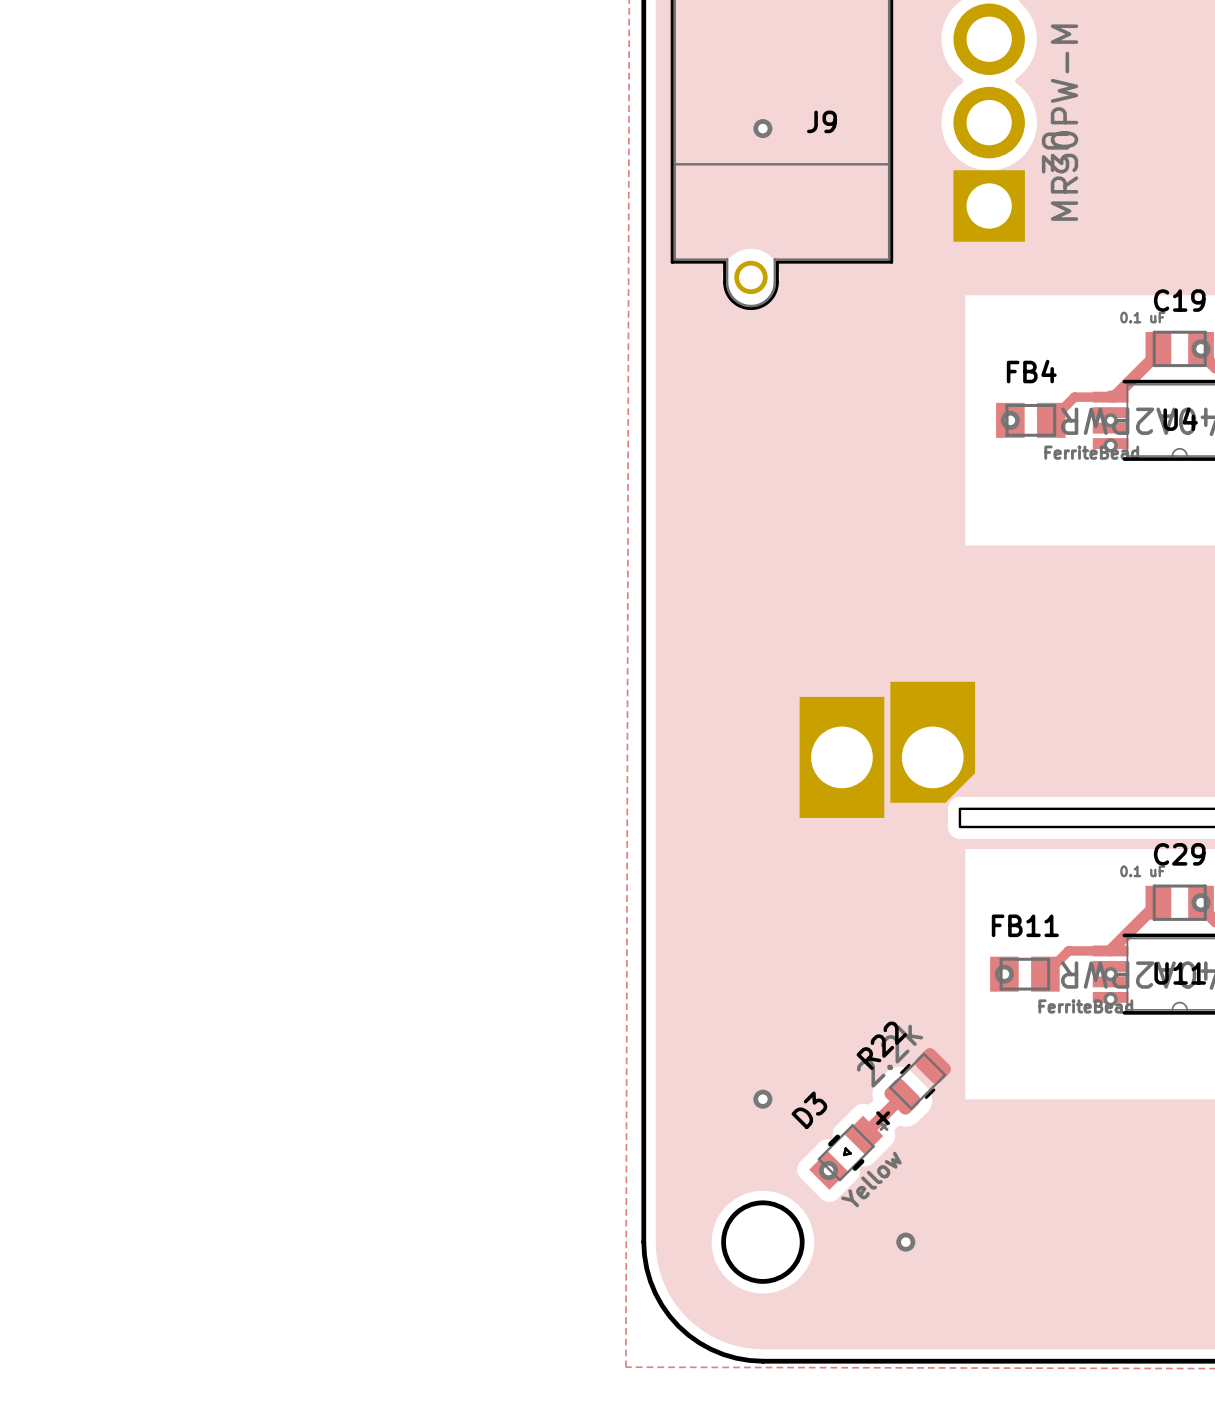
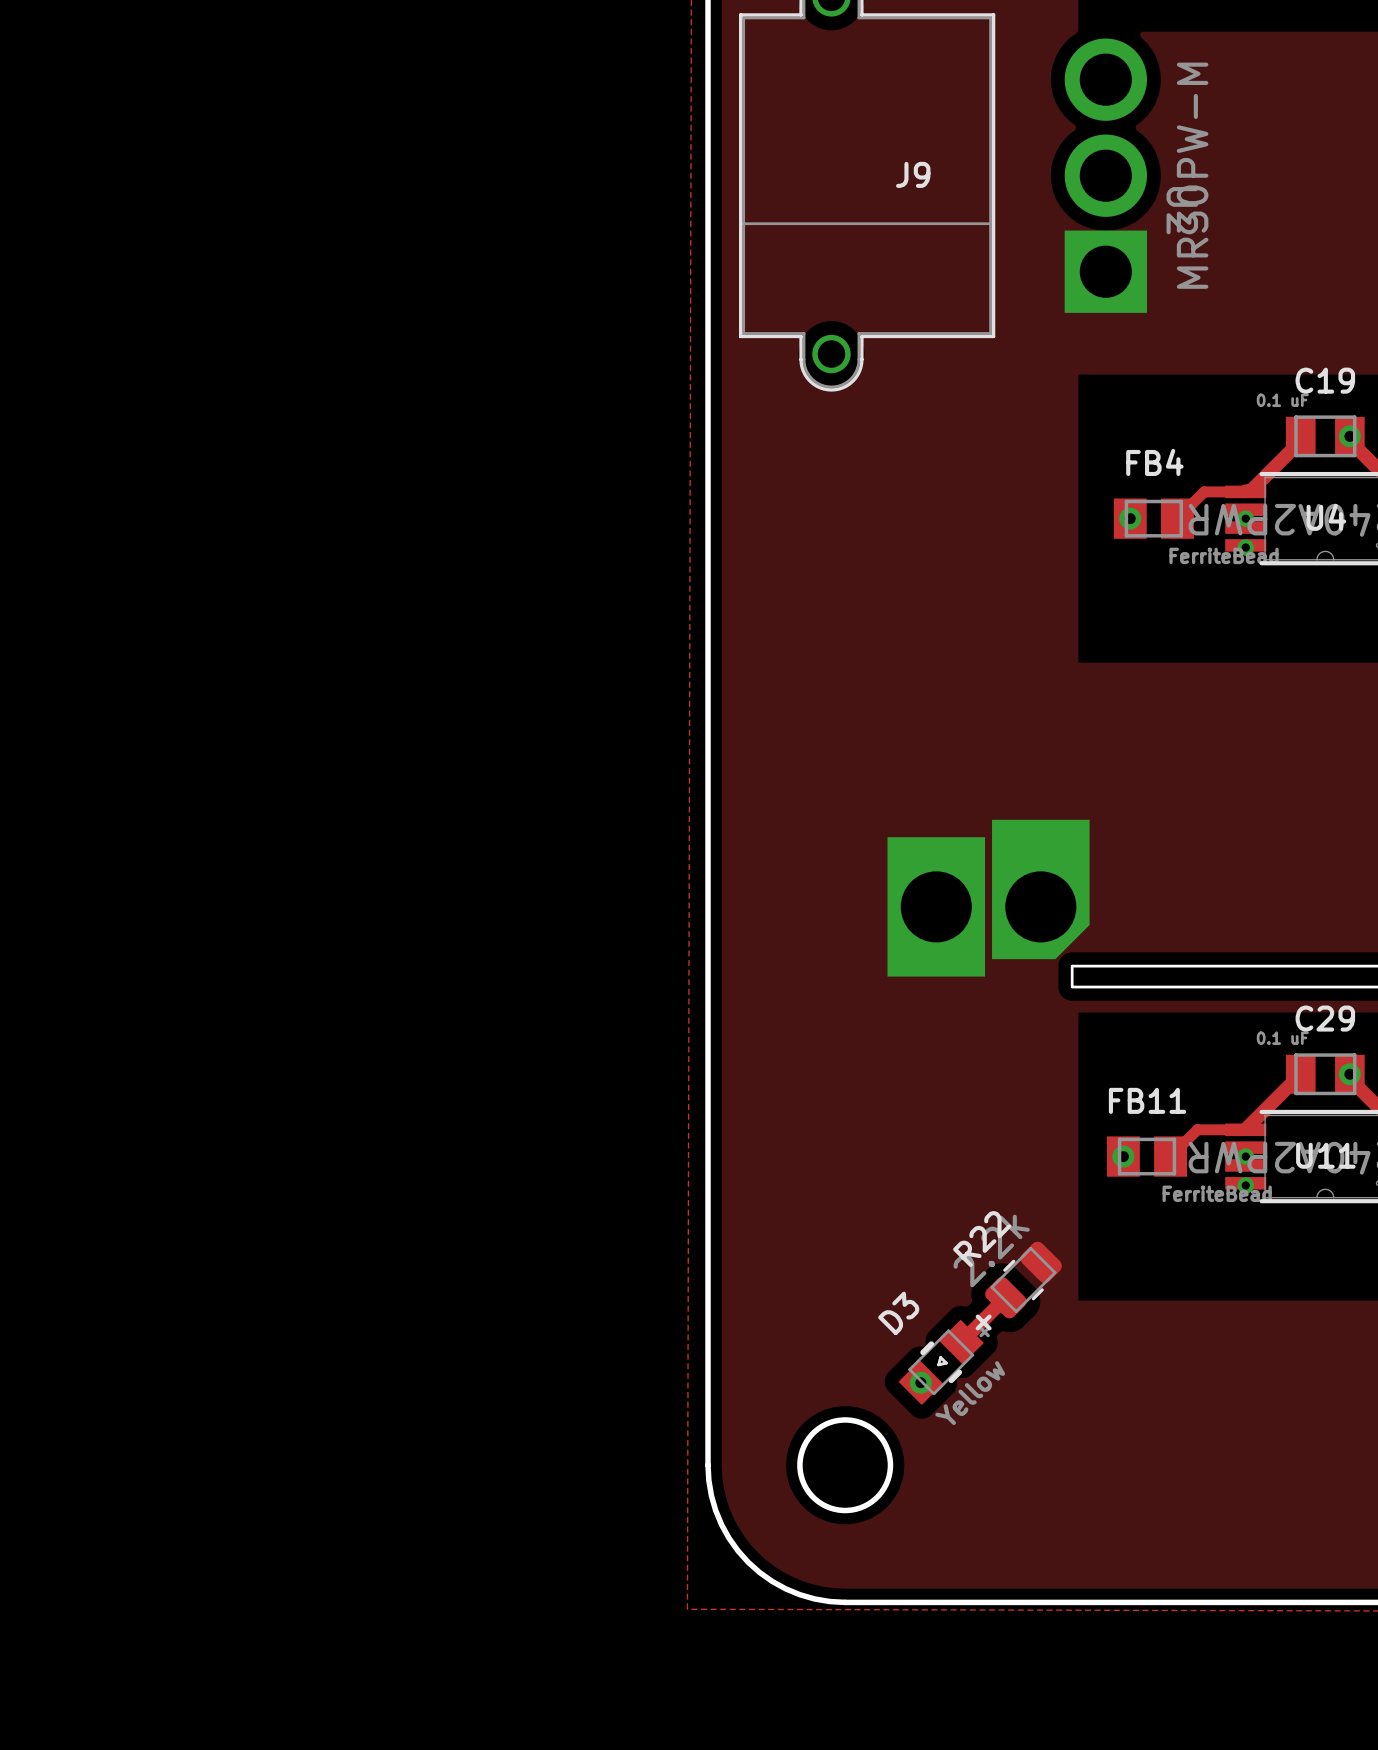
via: (762, 128) -> none
via: (762, 1099) -> none
via: (905, 1242) -> none

